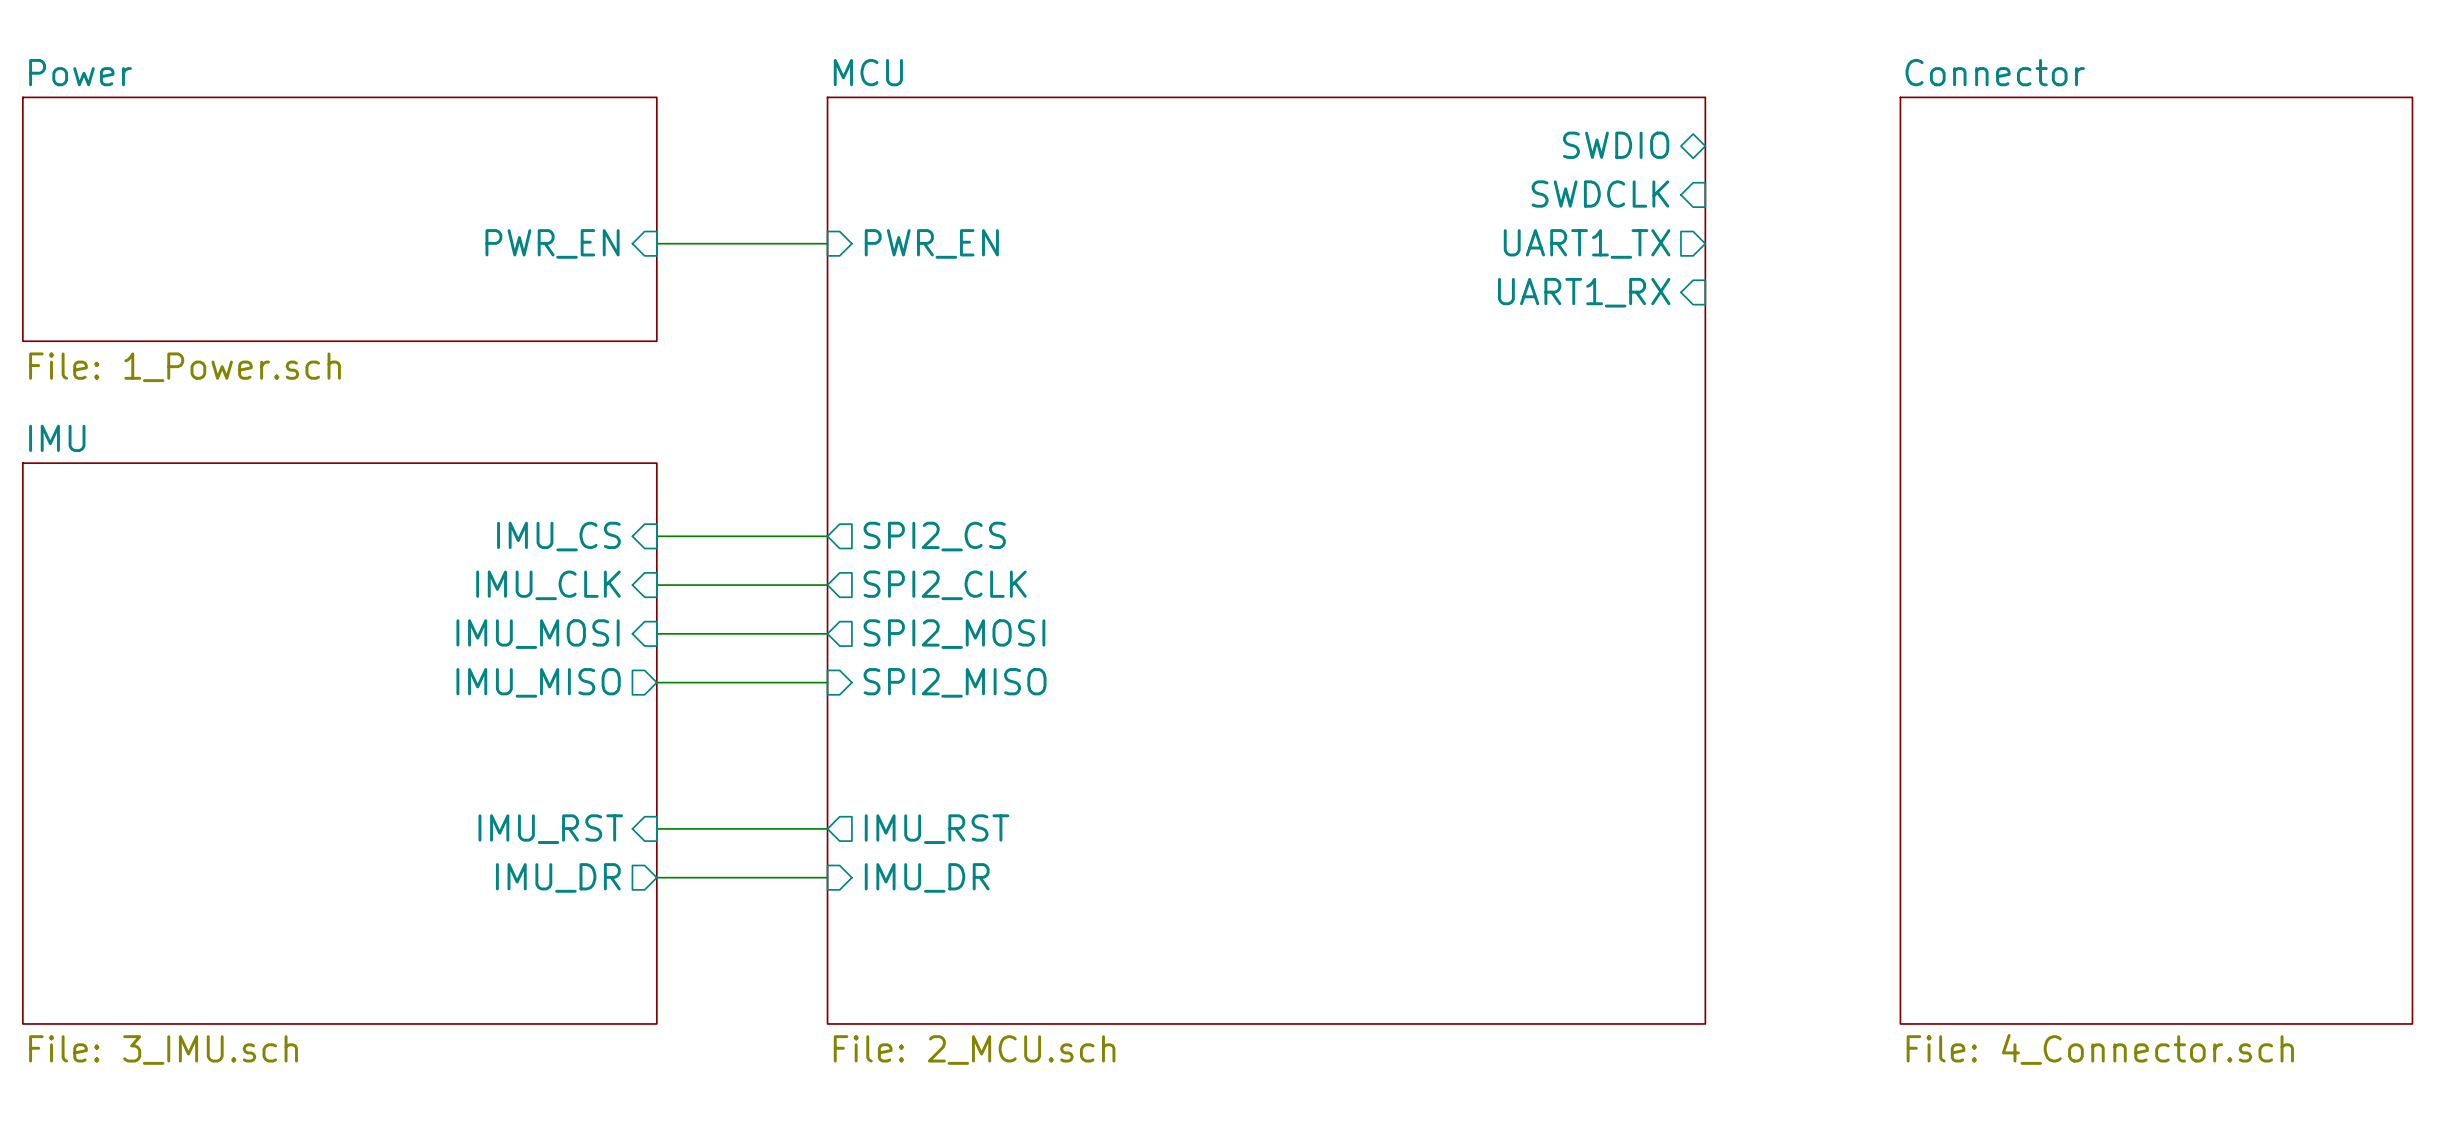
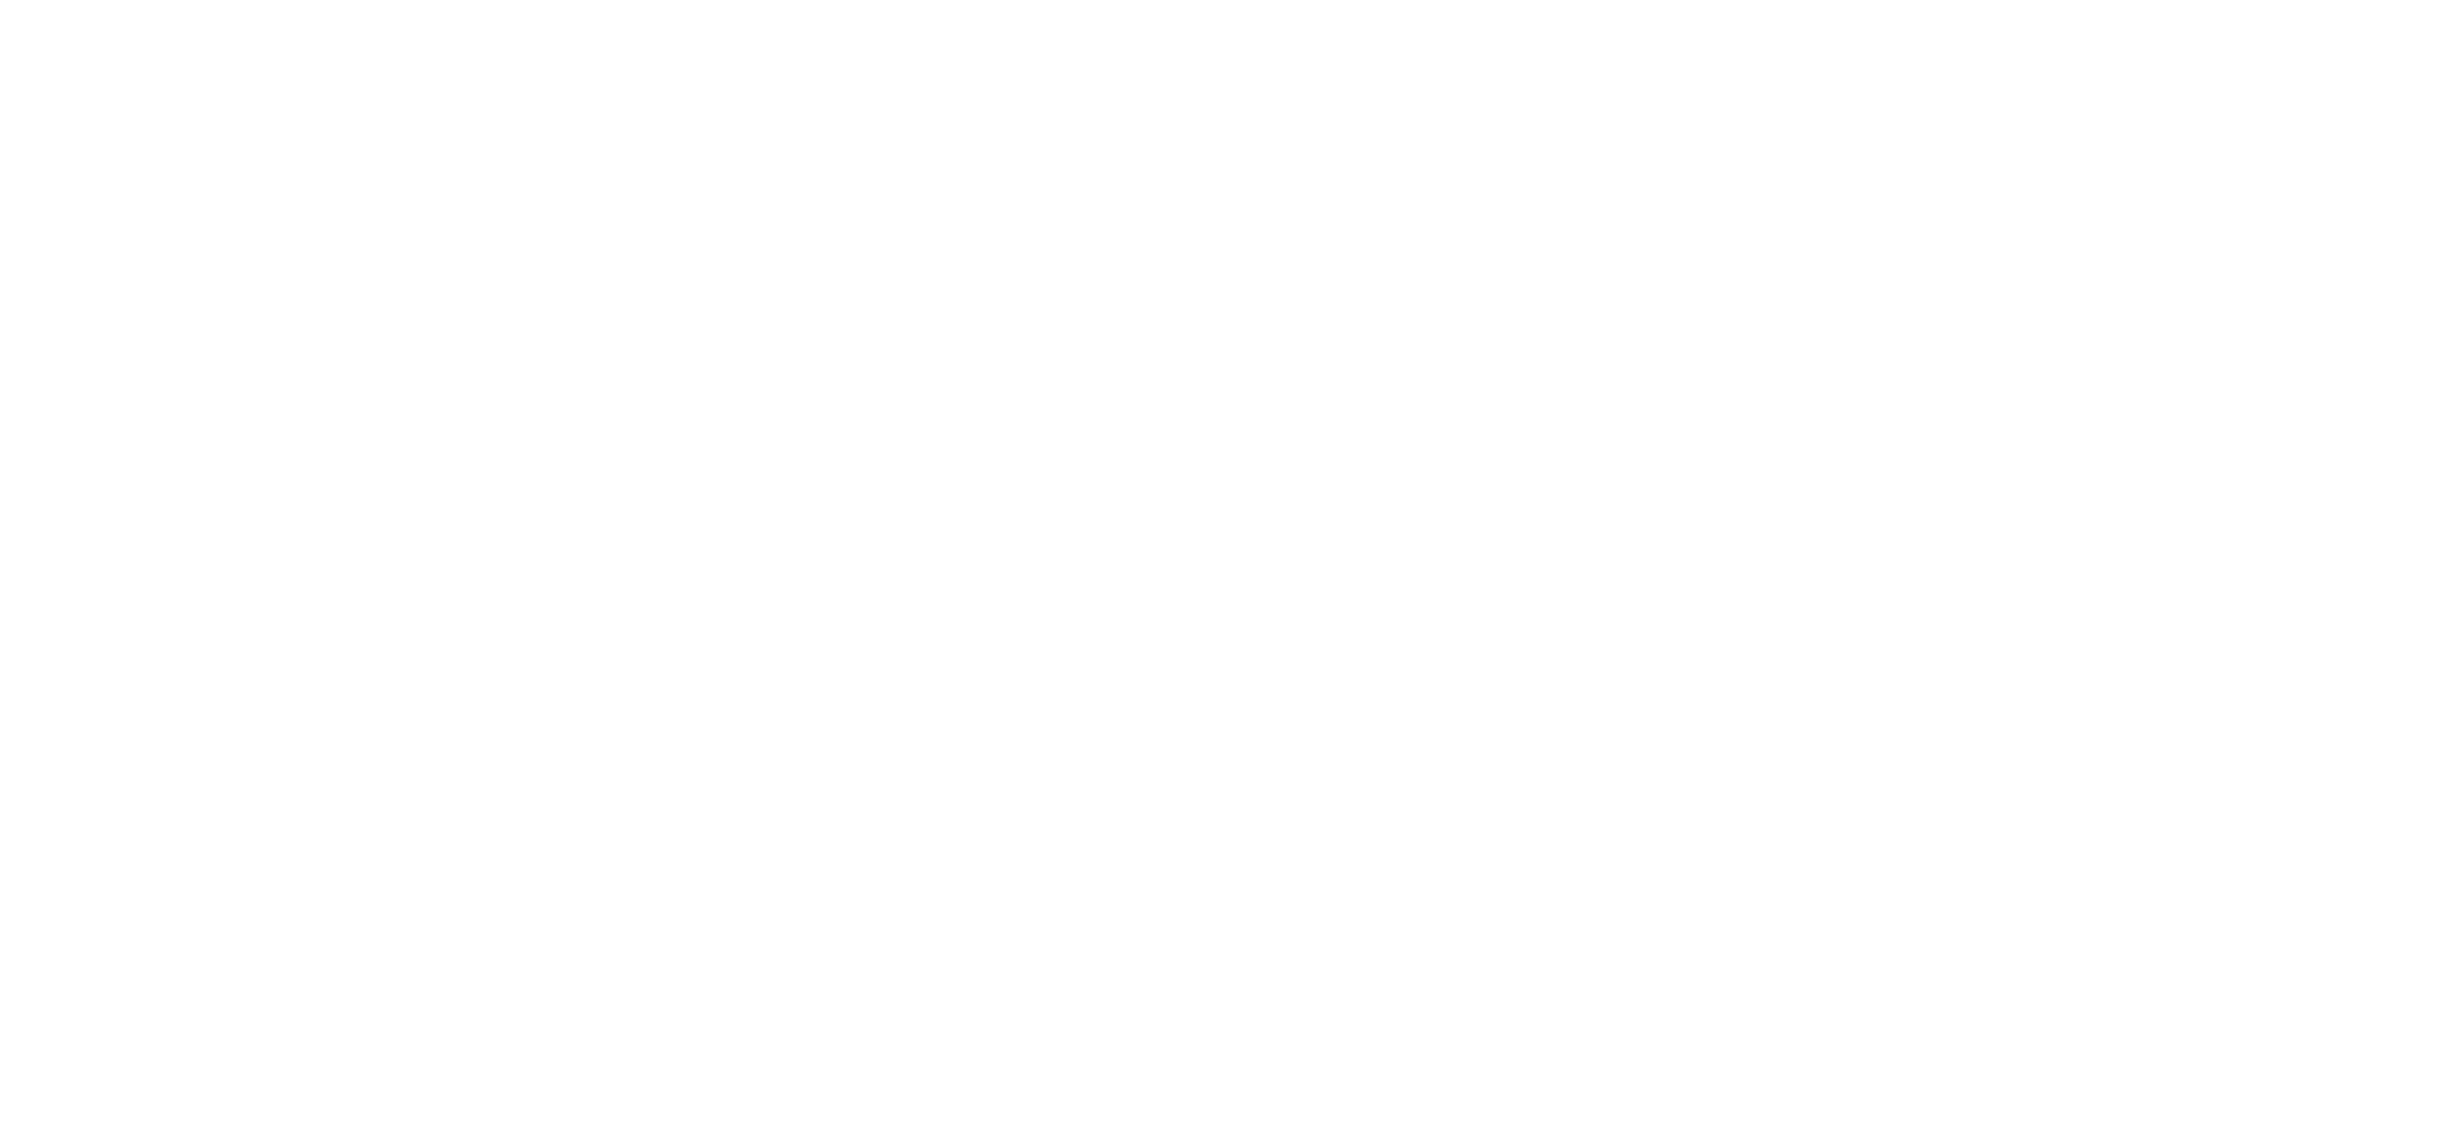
sheet pin: SWDIO (1616, 145) -> none
sheet pin: SWDCLK (1600, 194) -> none
sheet Power: File: 1_Power.sch (339, 219) -> none
sheet pin: PWR_EN (552, 243) -> none
wire: (656, 243) (827, 243) -> none
sheet pin: PWR_EN (931, 243) -> none
sheet pin: UART1_TX (1587, 243) -> none
sheet pin: UART1_RX (1584, 292) -> none
sheet pin: IMU_CS (558, 536) -> none
wire: (656, 536) (827, 536) -> none
sheet pin: SPI2_CS (934, 536) -> none
sheet MCU: File: 2_MCU.sch (1266, 560) -> none
sheet Connector: File: 4_Connector.sch (2156, 560) -> none
sheet pin: IMU_CLK (548, 585) -> none
wire: (656, 585) (827, 585) -> none
sheet pin: SPI2_CLK (945, 585) -> none
wire: (656, 633) (827, 633) -> none
sheet pin: IMU_MOSI (538, 634) -> none
sheet pin: SPI2_MOSI (954, 634) -> none
sheet pin: IMU_MISO (538, 682) -> none
wire: (656, 682) (827, 682) -> none
sheet pin: SPI2_MISO (955, 682) -> none
sheet IMU: File: 3_IMU.sch (339, 743) -> none
wire: (656, 828) (827, 828) -> none
sheet pin: IMU_RST (550, 829) -> none
sheet pin: IMU_RST (937, 829) -> none
sheet pin: IMU_DR (558, 877) -> none
wire: (656, 877) (827, 877) -> none
sheet pin: IMU_DR (927, 877) -> none

